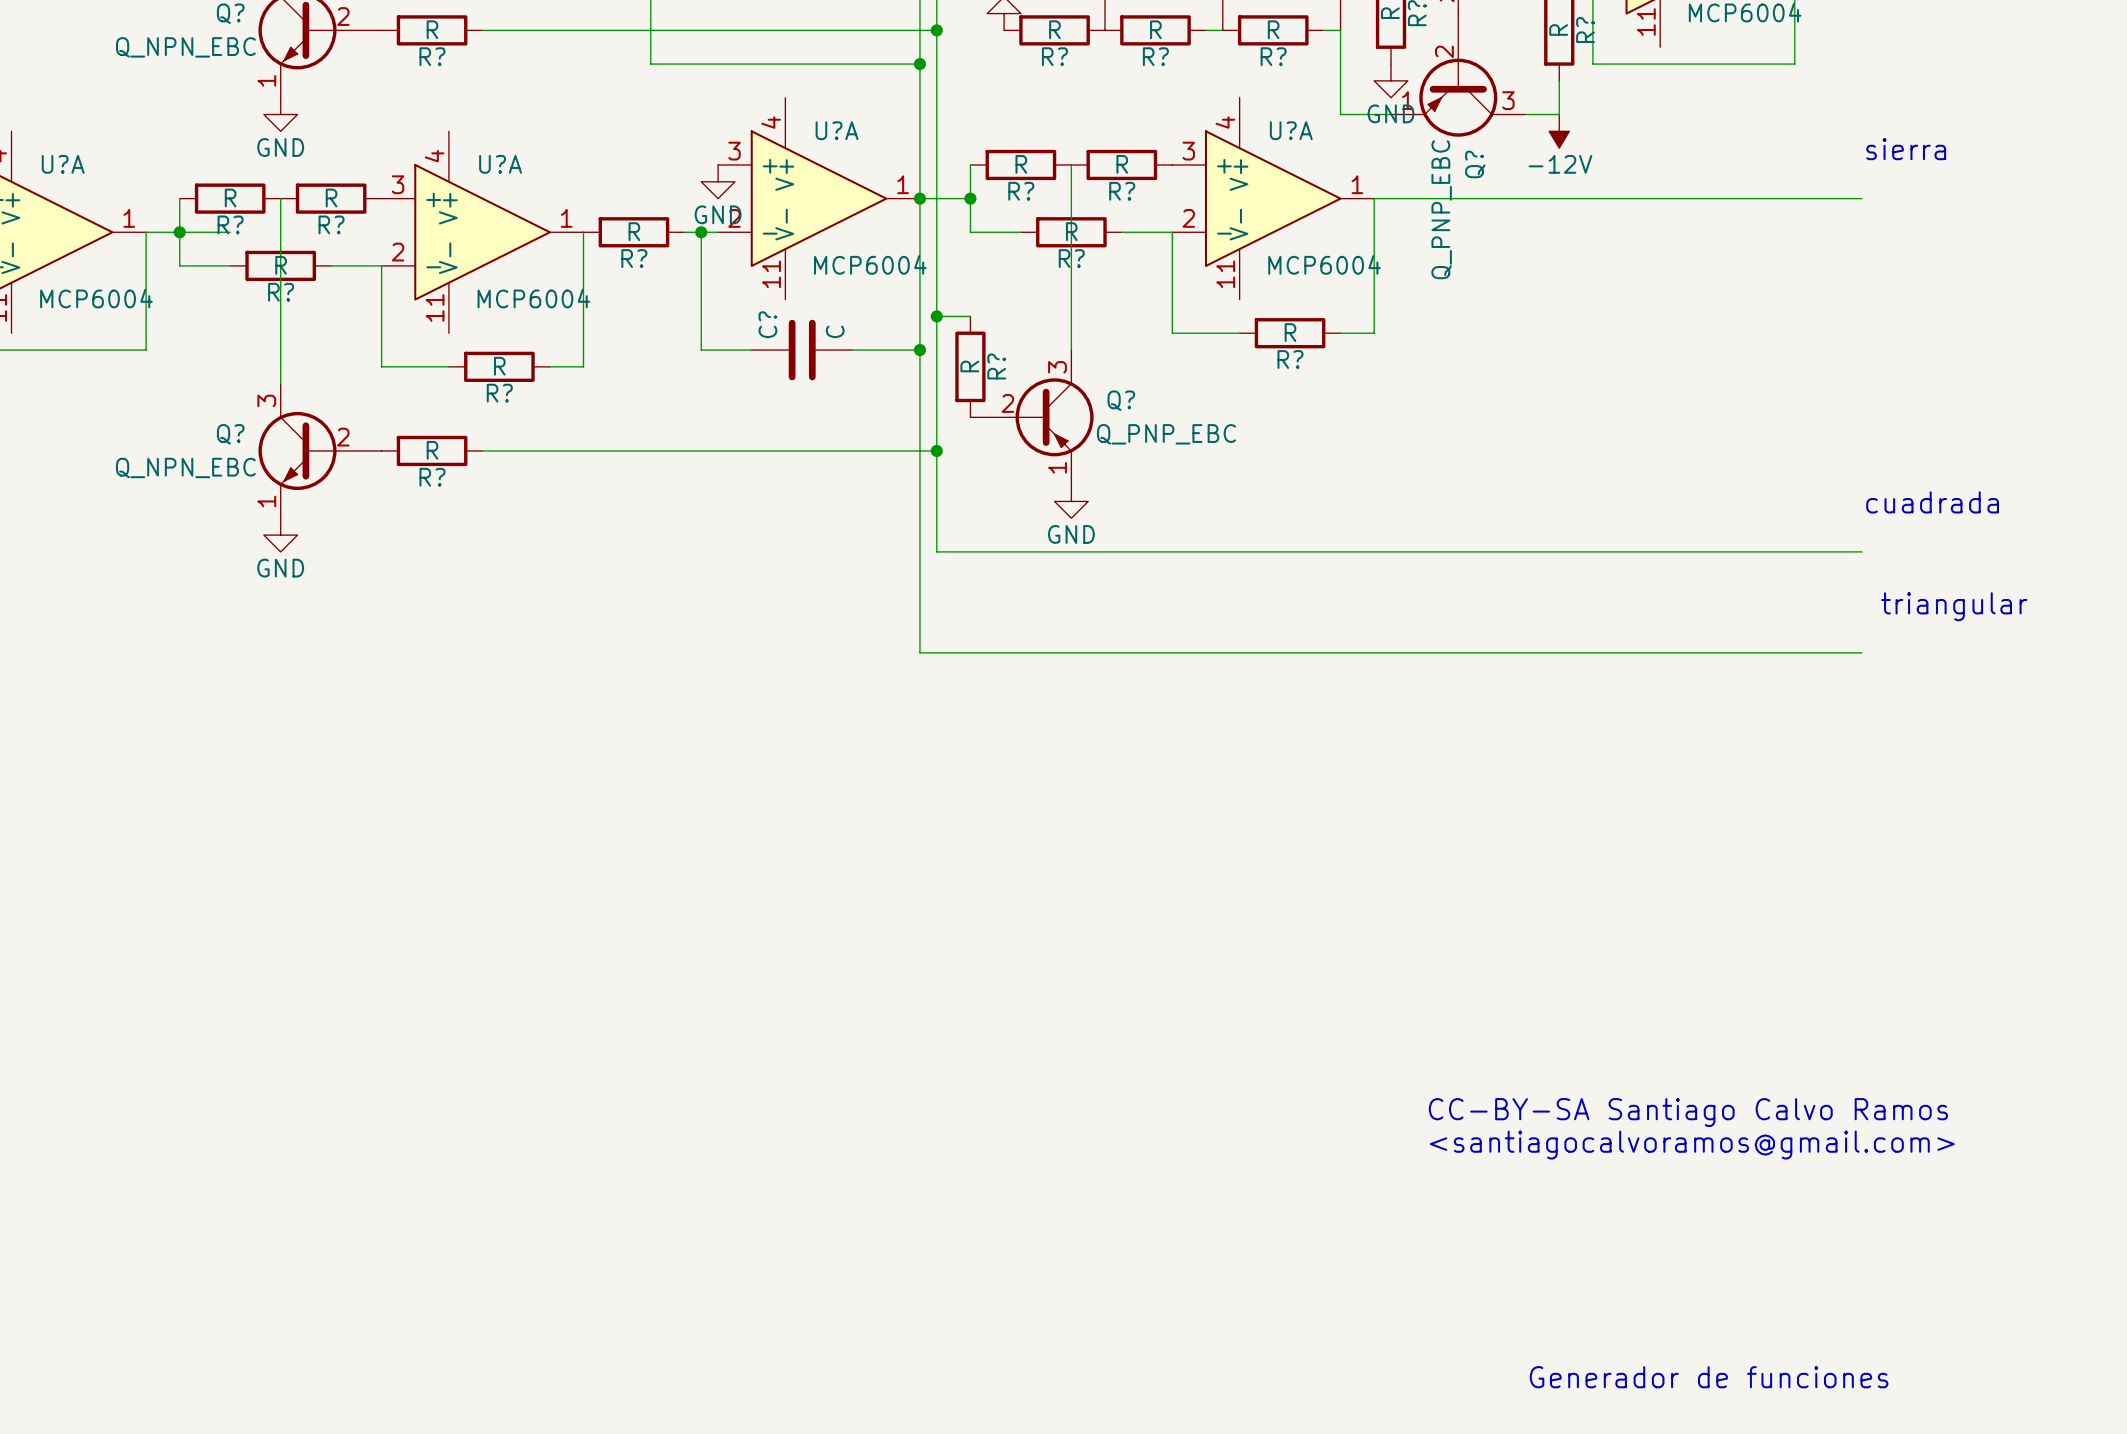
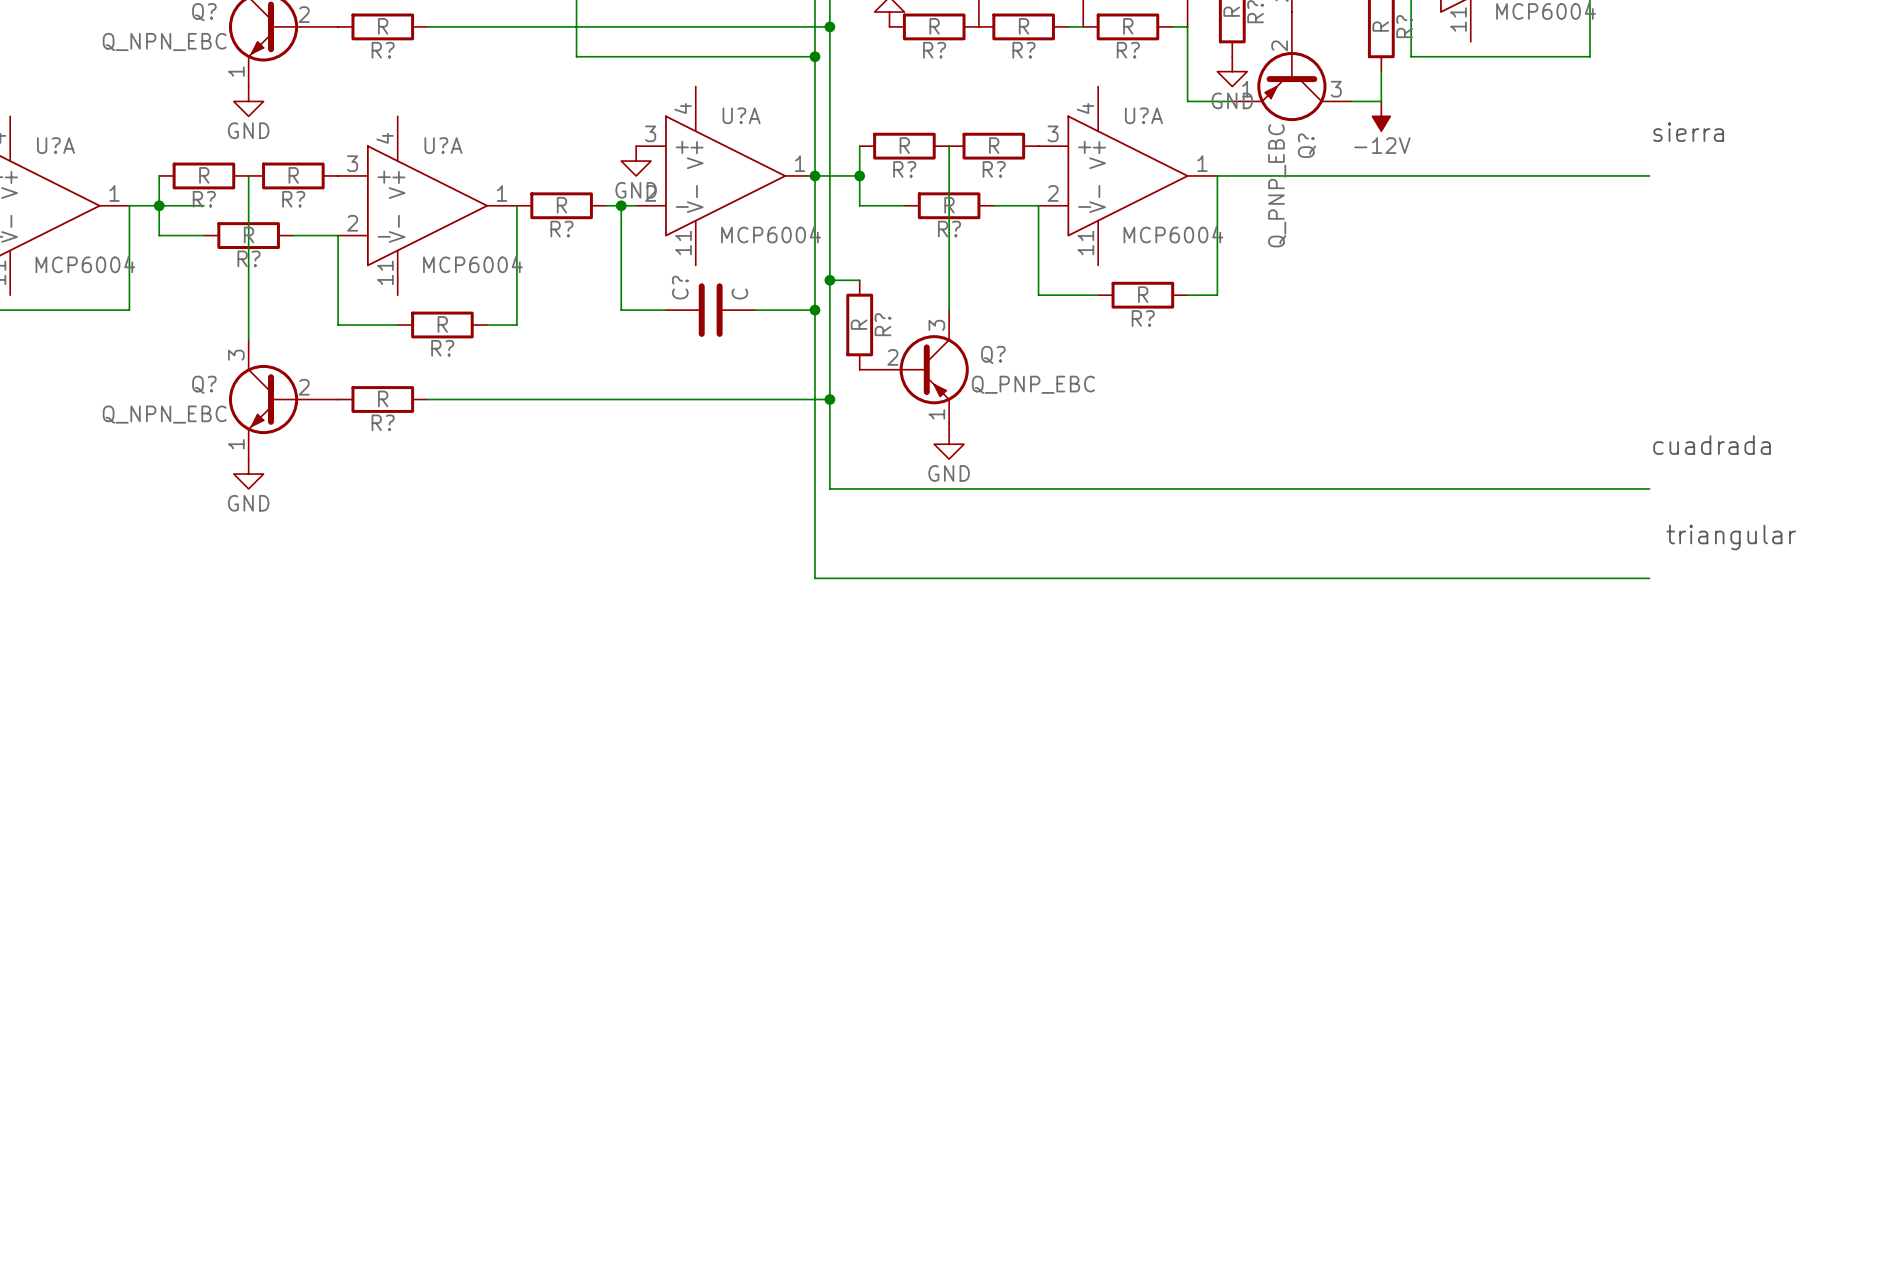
text: CC-BY-SA Santiago Calvo Ramos (1688, 1112) -> none
text: <santiagocalvoramos@gmail.com> (1692, 1145) -> none
text: Generador de funciones (1709, 1377) -> none

